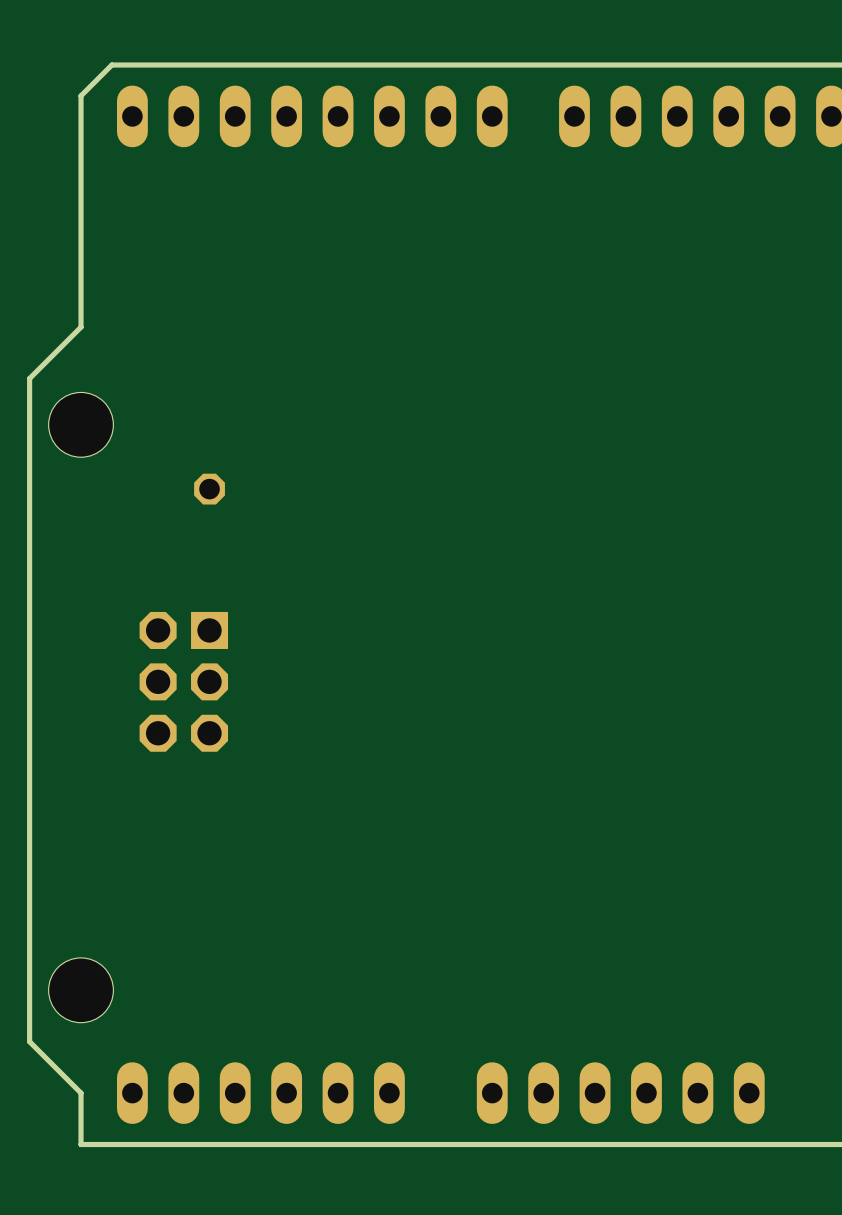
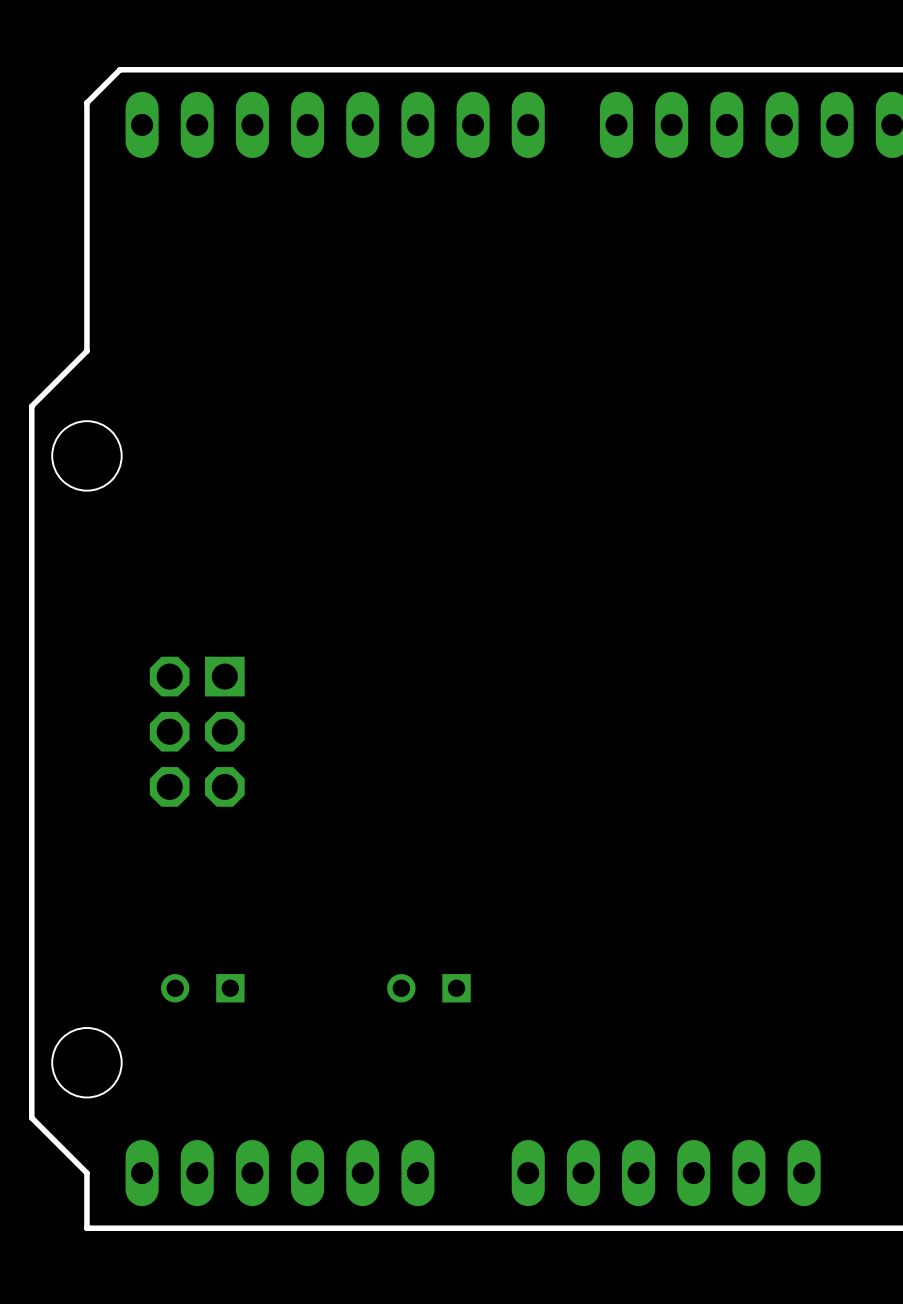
part: (209, 489) -> none
part: none -> (202, 988)
part: none -> (428, 988)

